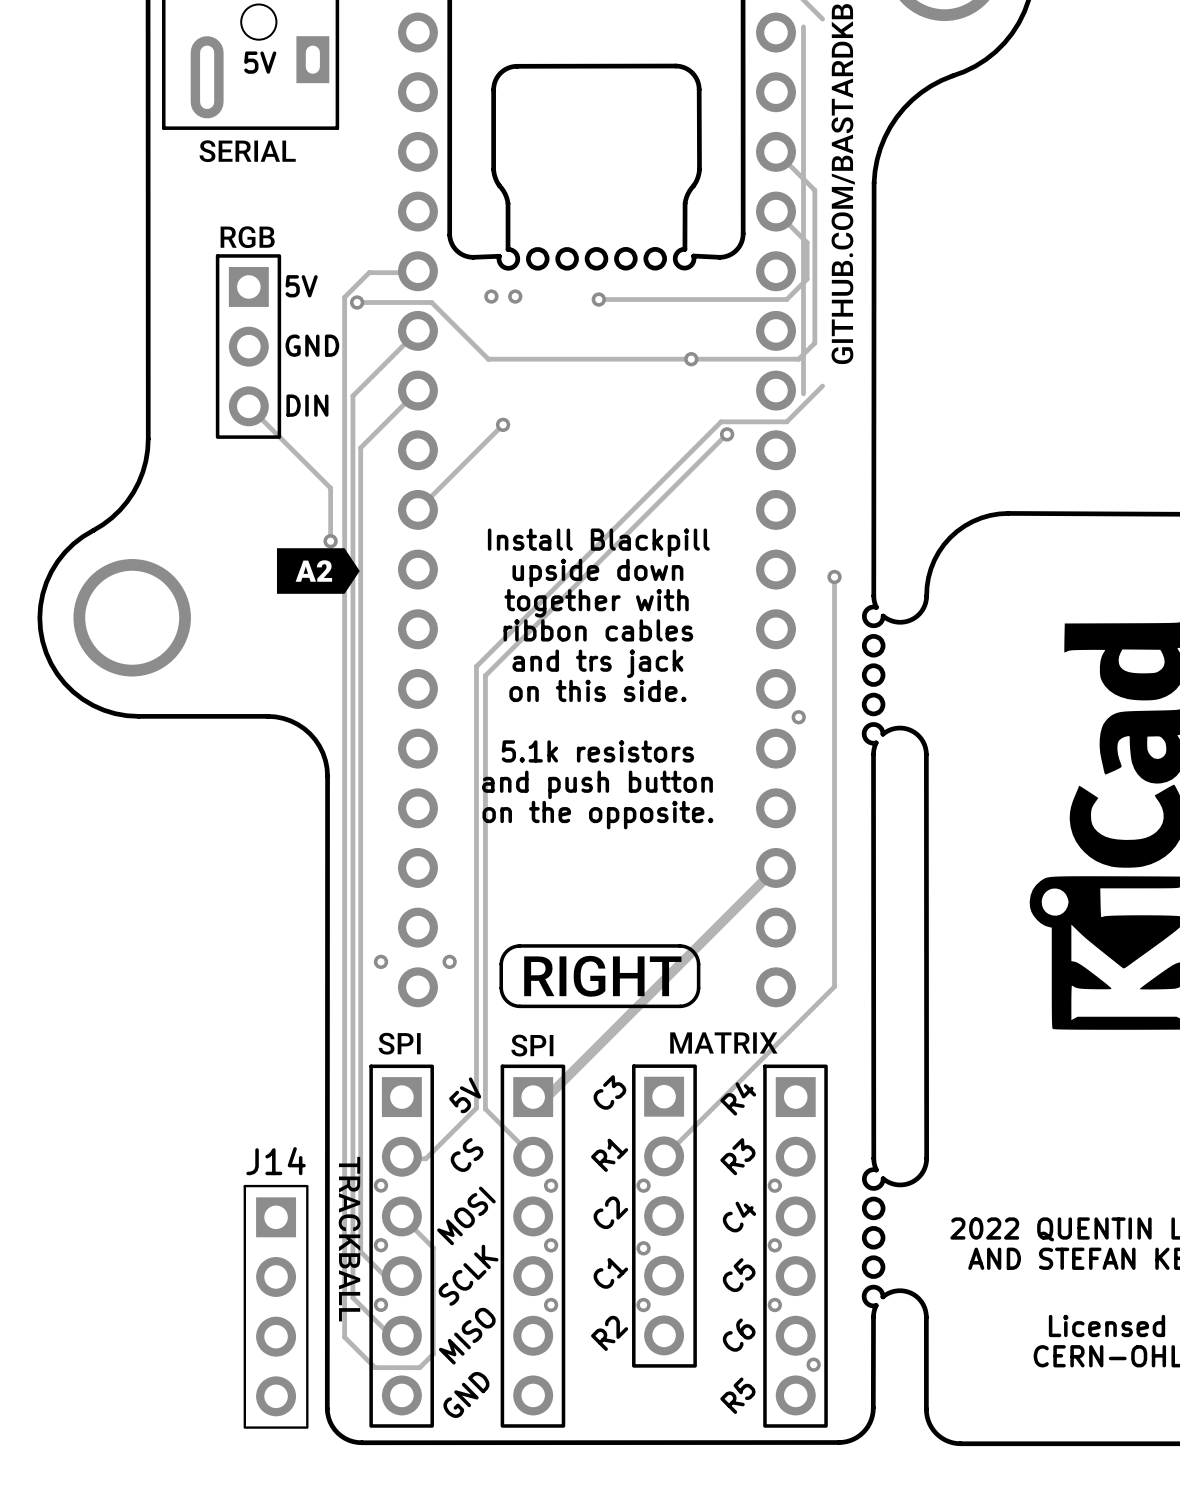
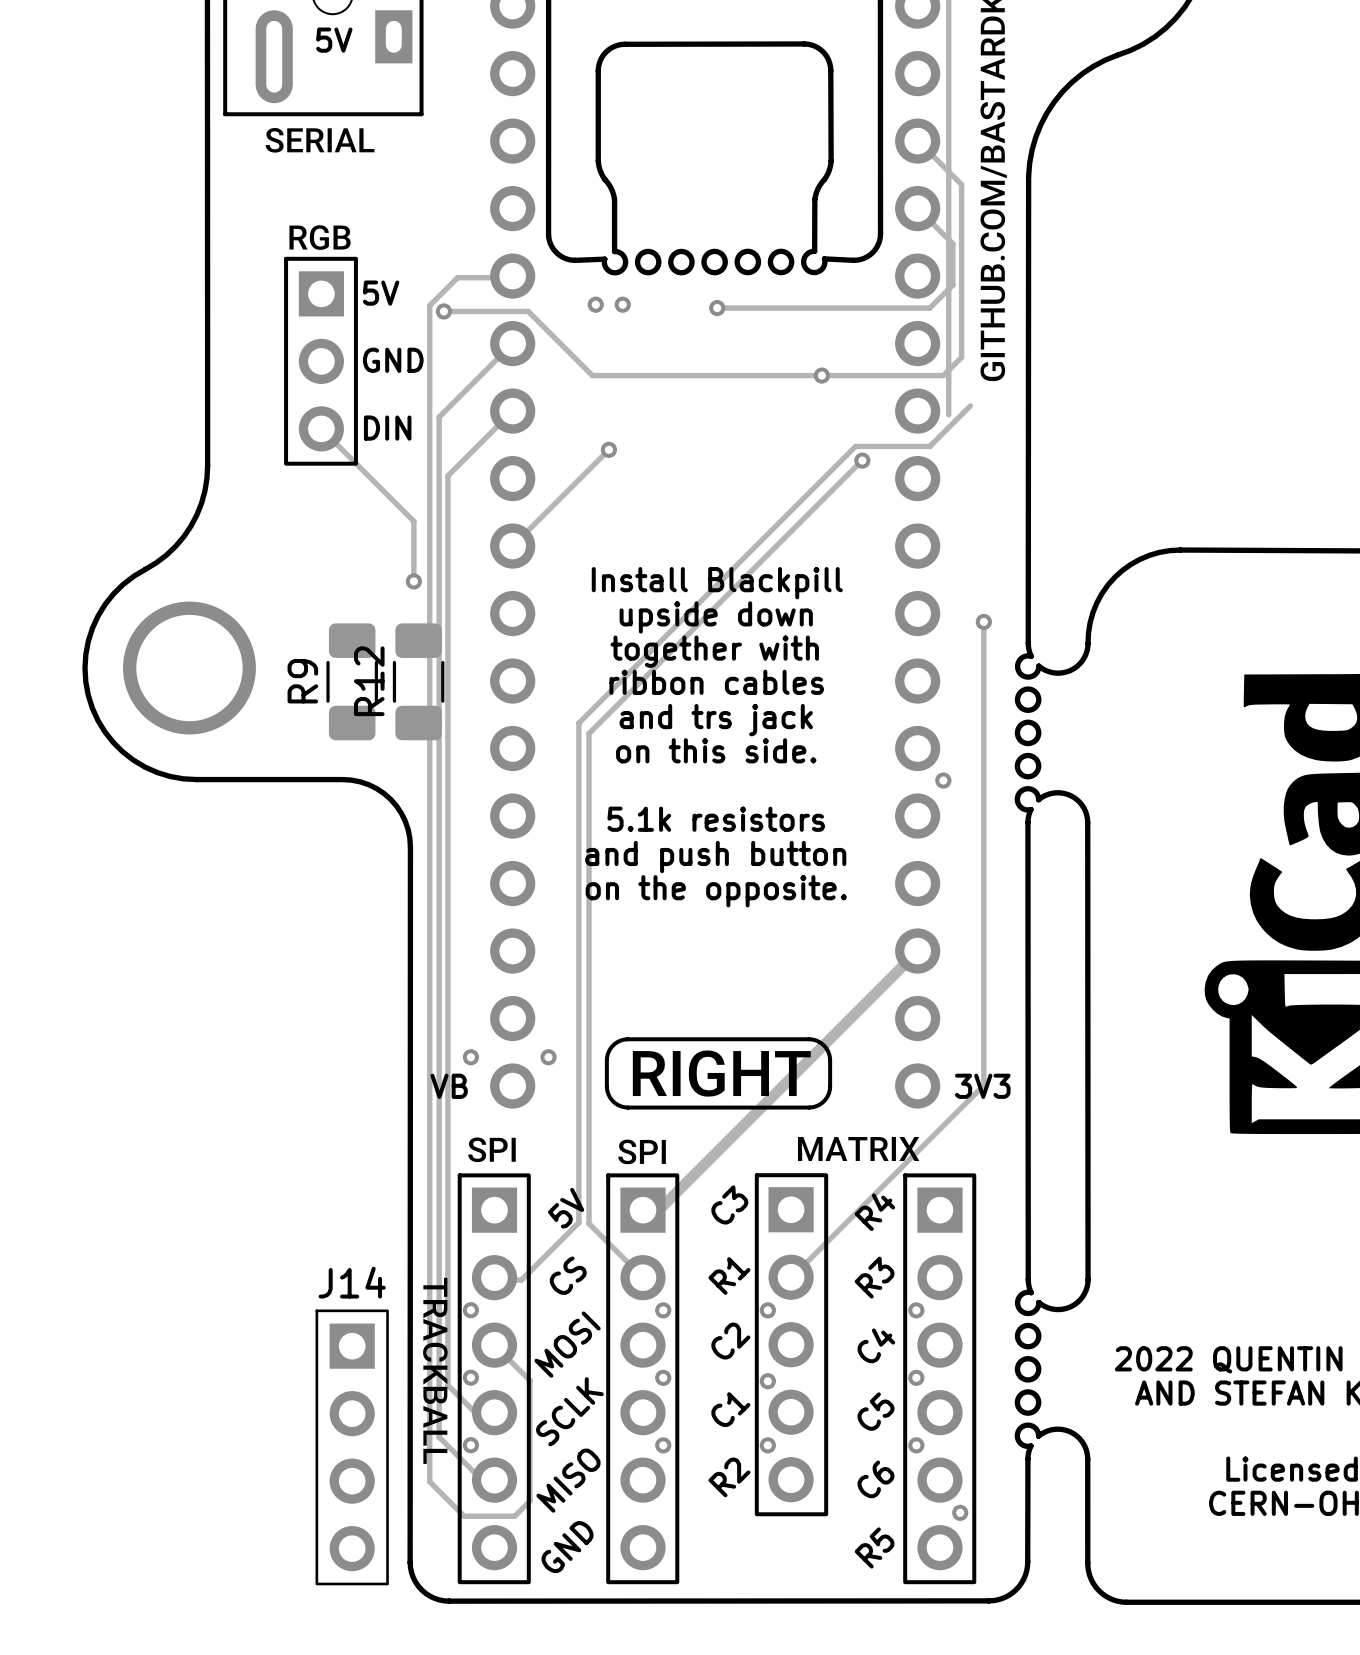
drawing: [276, 548, 360, 594] -> none
R9: none -> (352, 681)
R12: none -> (418, 681)
text: none -> VB (449, 1086)
text: none -> 3V3 (982, 1086)

